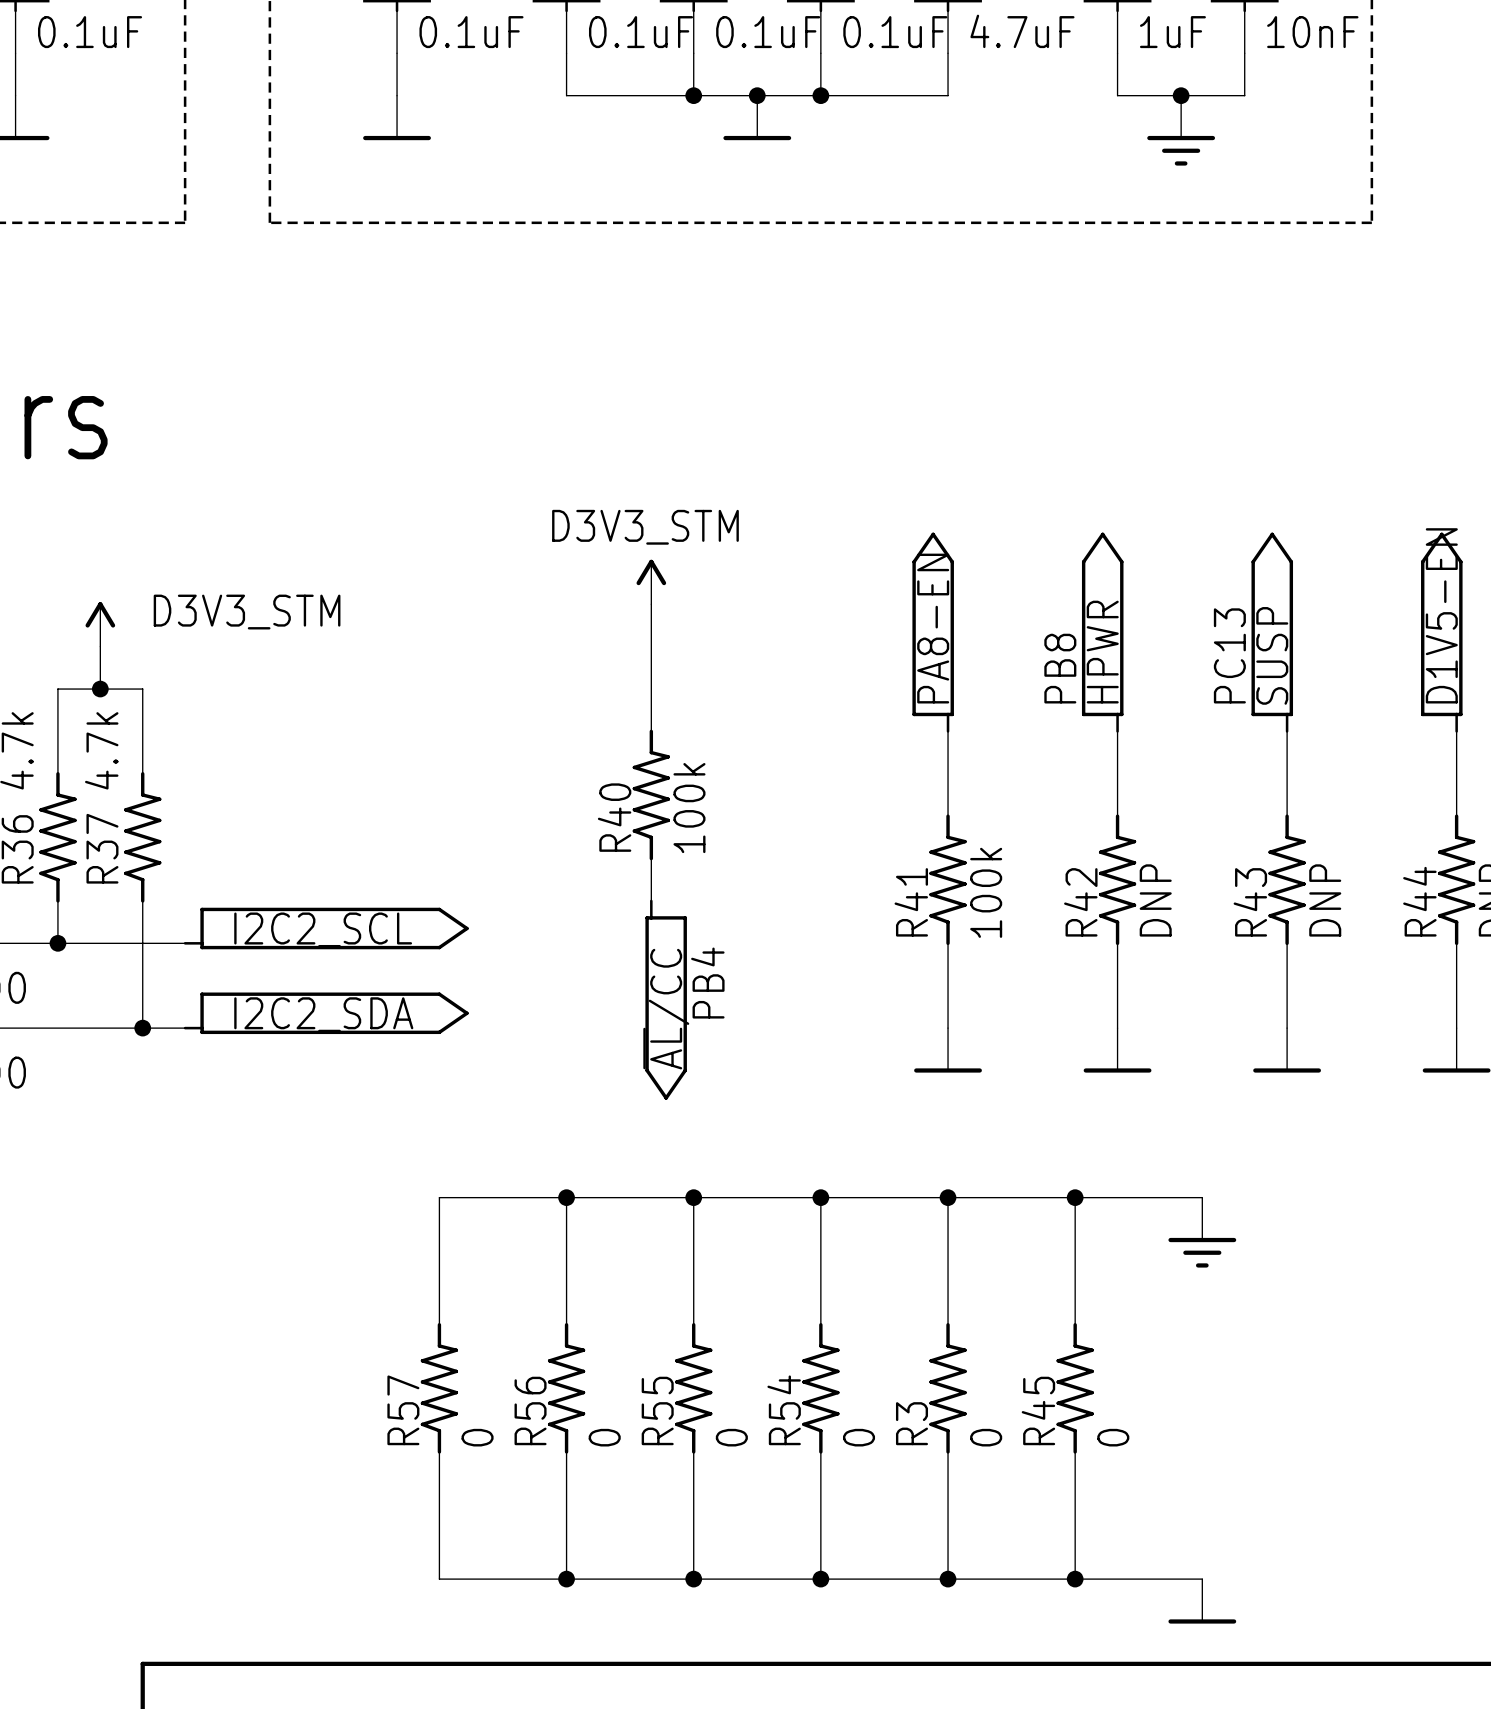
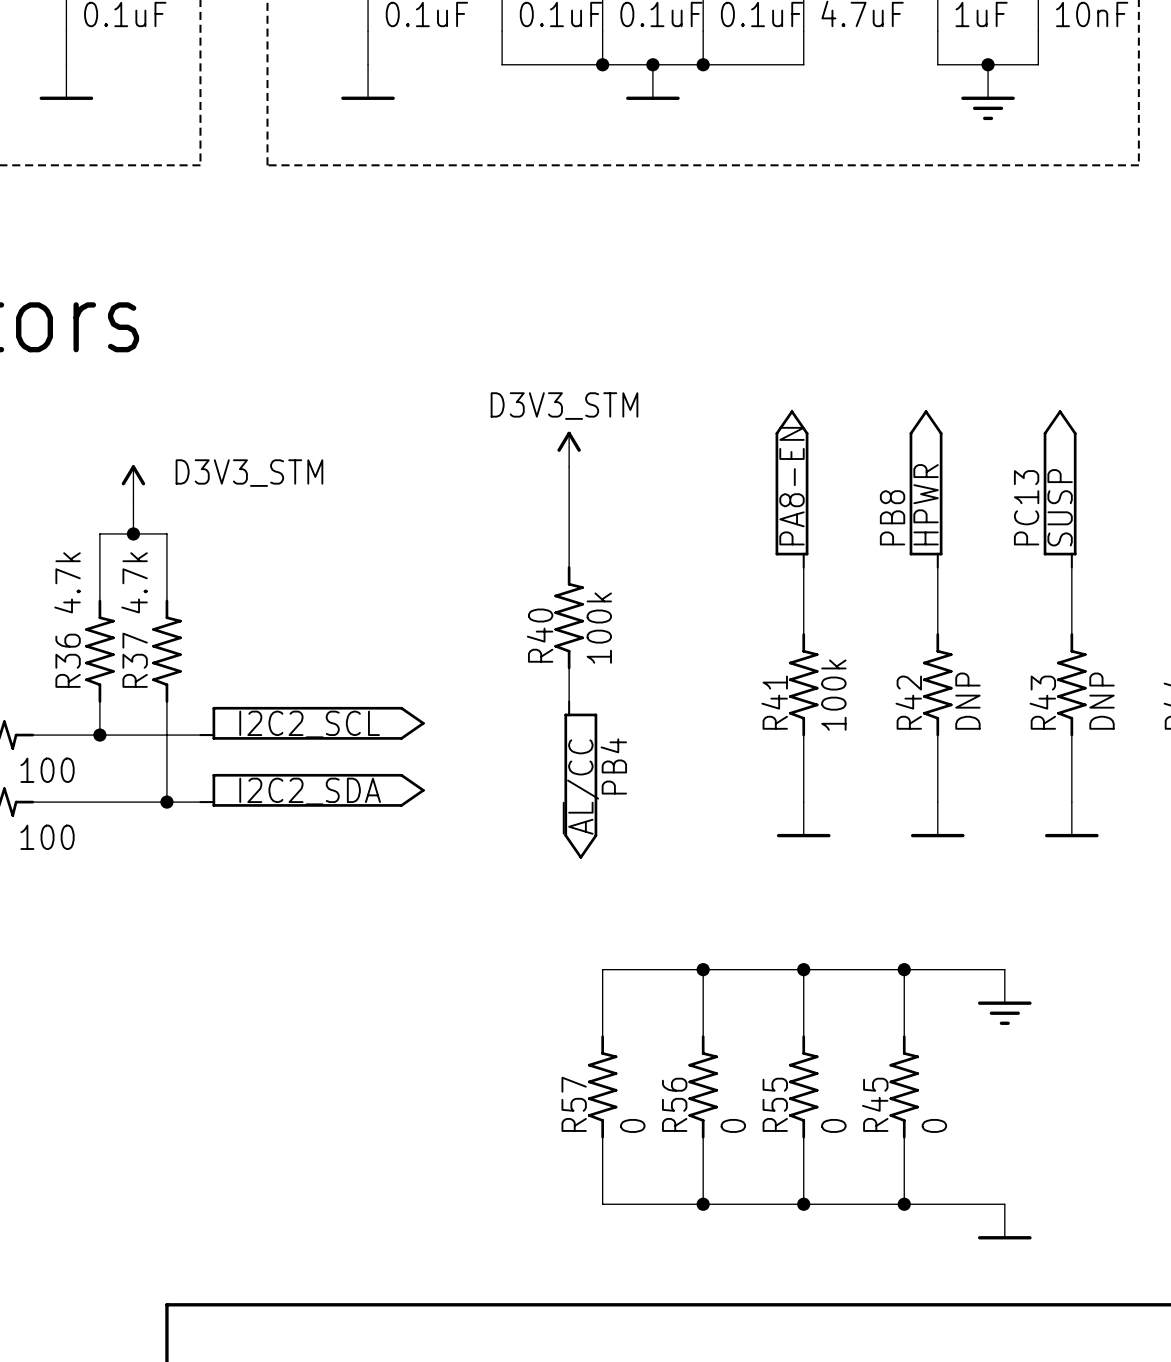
wire: (566, 1197) (566, 1324) -> none
junction: (566, 1197) -> none
wire: (693, 1197) (693, 1240) -> (1004, 969) (602, 969)
junction: (693, 1197) -> none
wire: (820, 1197) (820, 1240) -> none
junction position: (820, 1197) -> (703, 969)
wire: (948, 1197) (948, 1240) -> none
junction position: (948, 1197) -> (803, 969)
wire: (1075, 1197) (1075, 1240) -> none
junction position: (1075, 1197) -> (904, 969)
wire: (1202, 1197) (439, 1197) (439, 1324) -> none
power symbol position: (1202, 1232) -> (1004, 997)
R57: 0 (439, 1388) -> none
R56: 0 (566, 1388) -> none
R55 name: R55 (657, 1410) -> R57 (574, 1104)
R54 name: R54 (784, 1410) -> R56 (674, 1104)
R3 name: R3 (911, 1423) -> R55 (775, 1104)
wire: (439, 1451) (439, 1579) (1202, 1579) -> none
wire: (566, 1451) (566, 1579) -> none
wire: (693, 1536) (693, 1579) -> (602, 1204) (1004, 1204)
wire: (820, 1536) (820, 1579) -> none
wire: (948, 1536) (948, 1579) -> none
wire: (1075, 1536) (1075, 1579) -> none
junction: (566, 1579) -> none
junction: (693, 1579) -> none
junction position: (820, 1579) -> (703, 1204)
junction position: (948, 1579) -> (803, 1204)
junction position: (1075, 1579) -> (904, 1204)
power symbol position: (1202, 1601) -> (1004, 1221)

